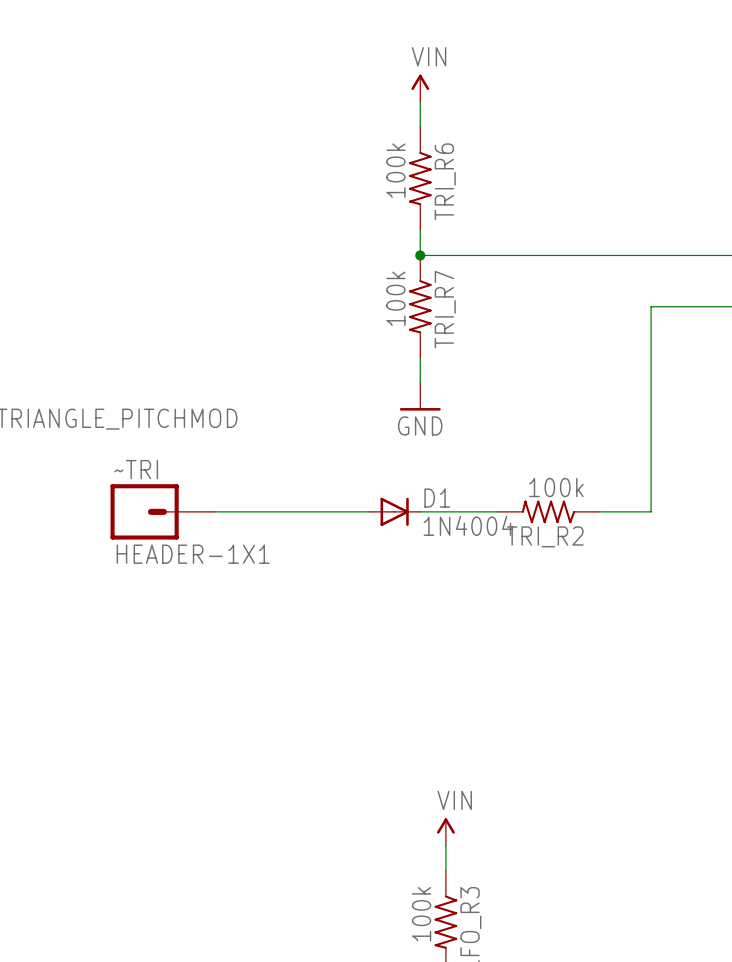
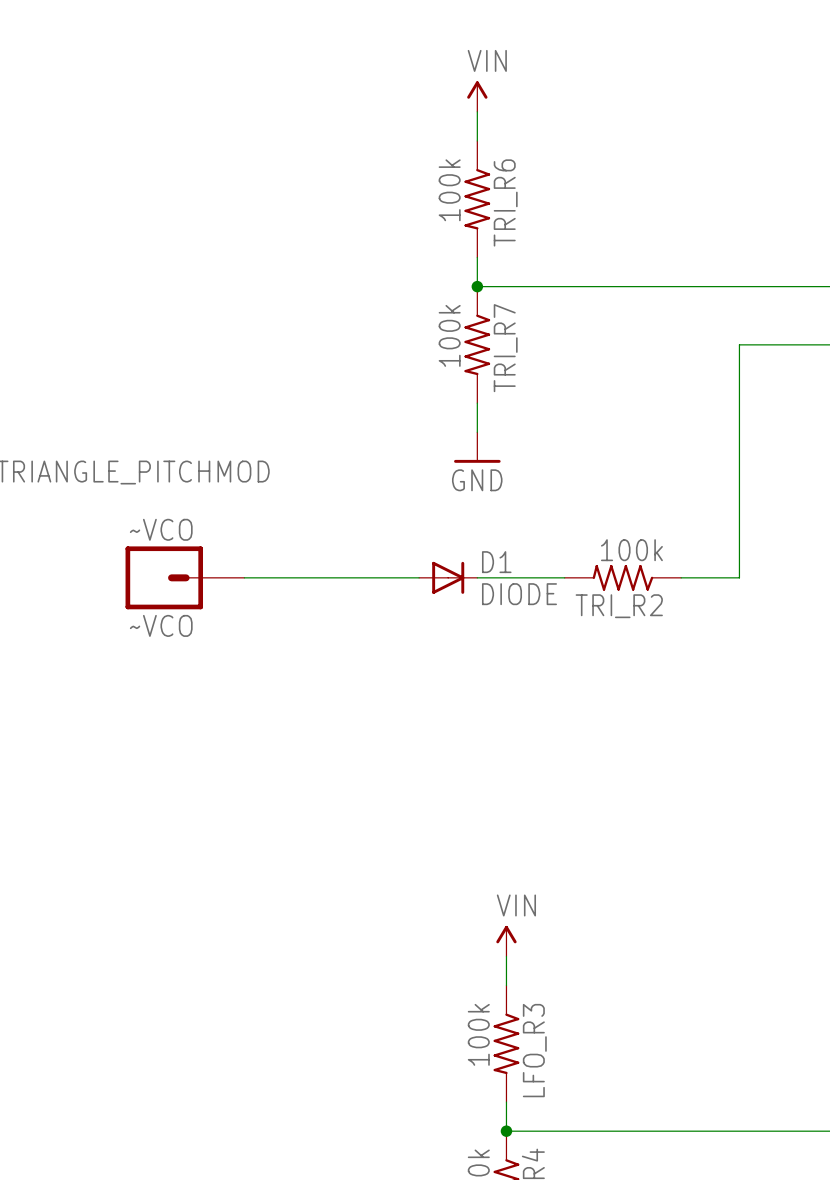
~TRI name: ~TRI (136, 469) -> ~VCO (161, 529)
D1 value: 1N4004 (468, 525) -> DIODE (519, 594)
~TRI value: HEADER-1X1 (193, 554) -> ~VCO (161, 625)

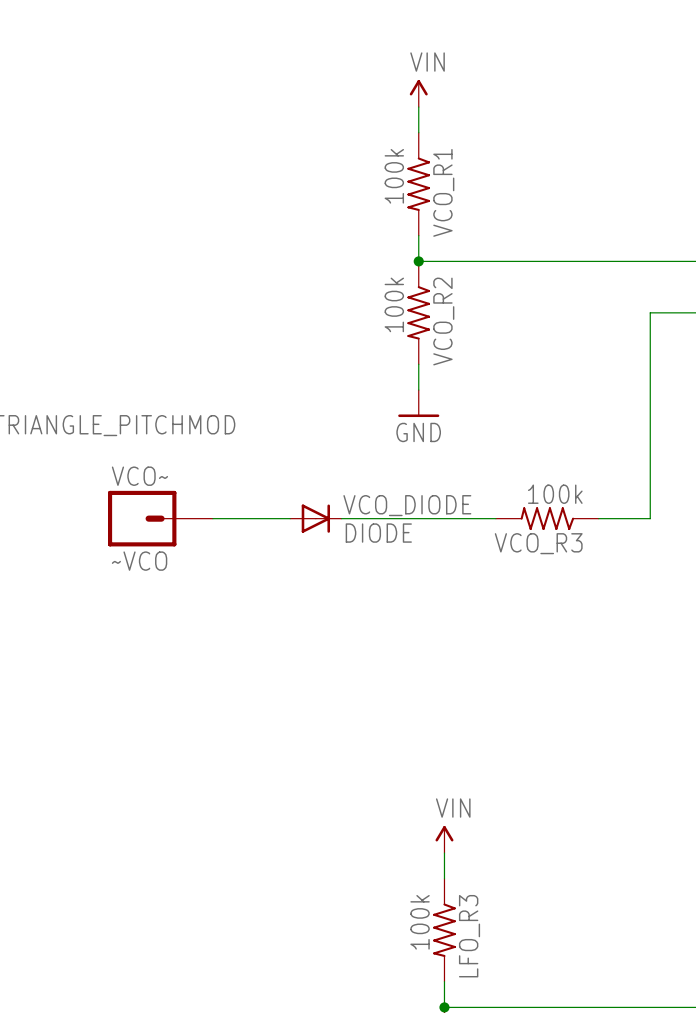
TRI_R6 name: TRI_R6 (505, 202) -> VCO_R1 (443, 192)
TRI_R7 name: TRI_R7 (505, 348) -> VCO_R2 (443, 321)
~VCO name: ~VCO (161, 529) -> VCO~ (139, 476)
VCO_DIODE: none -> DIODE (315, 518)
D1: DIODE (448, 577) -> none
TRI_R2 name: TRI_R2 (619, 606) -> VCO_R3 (538, 543)

